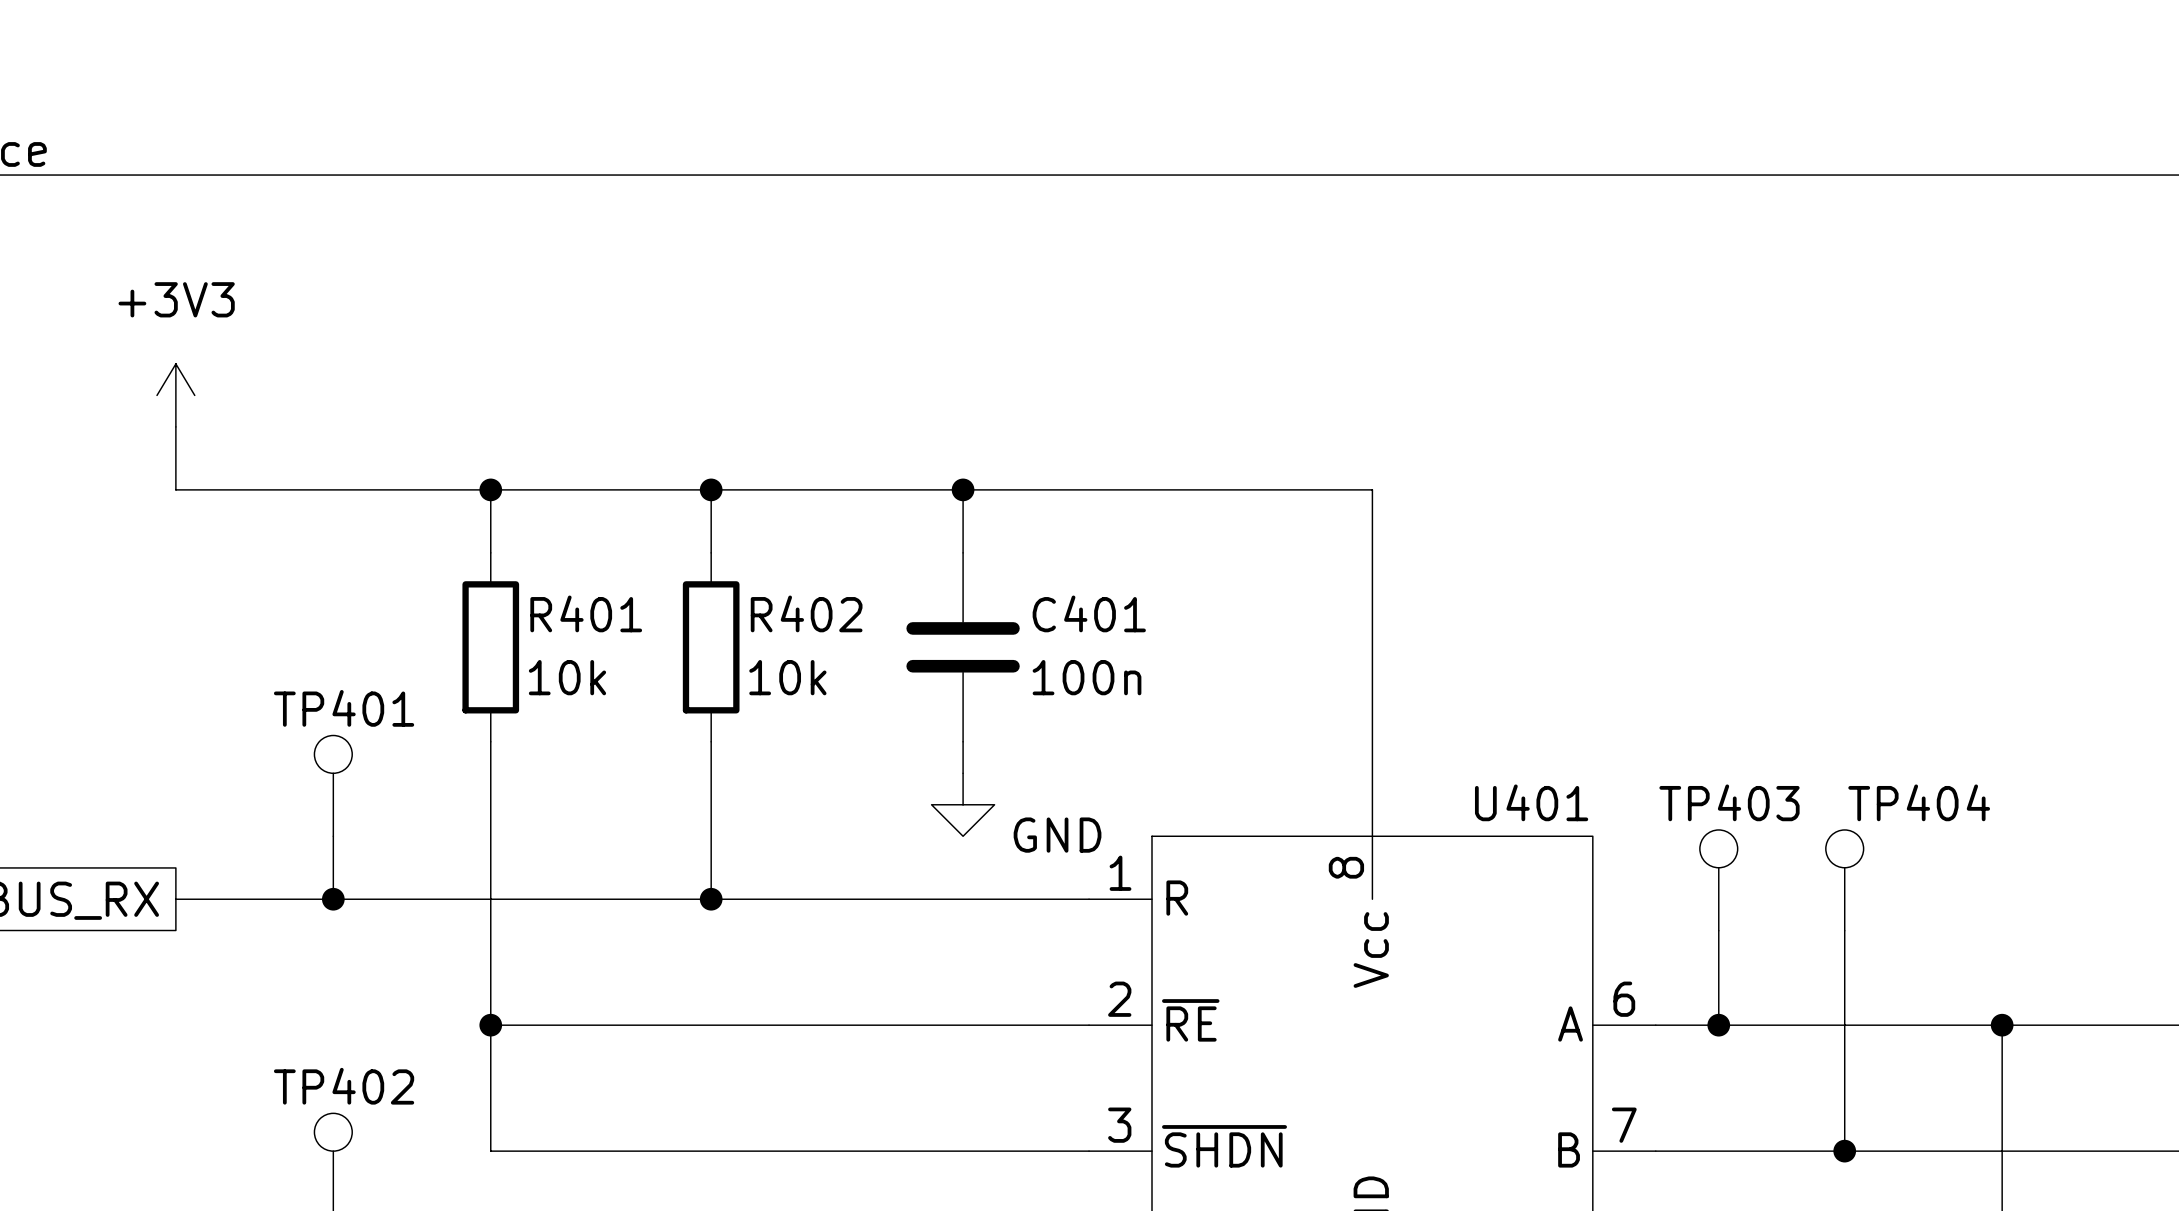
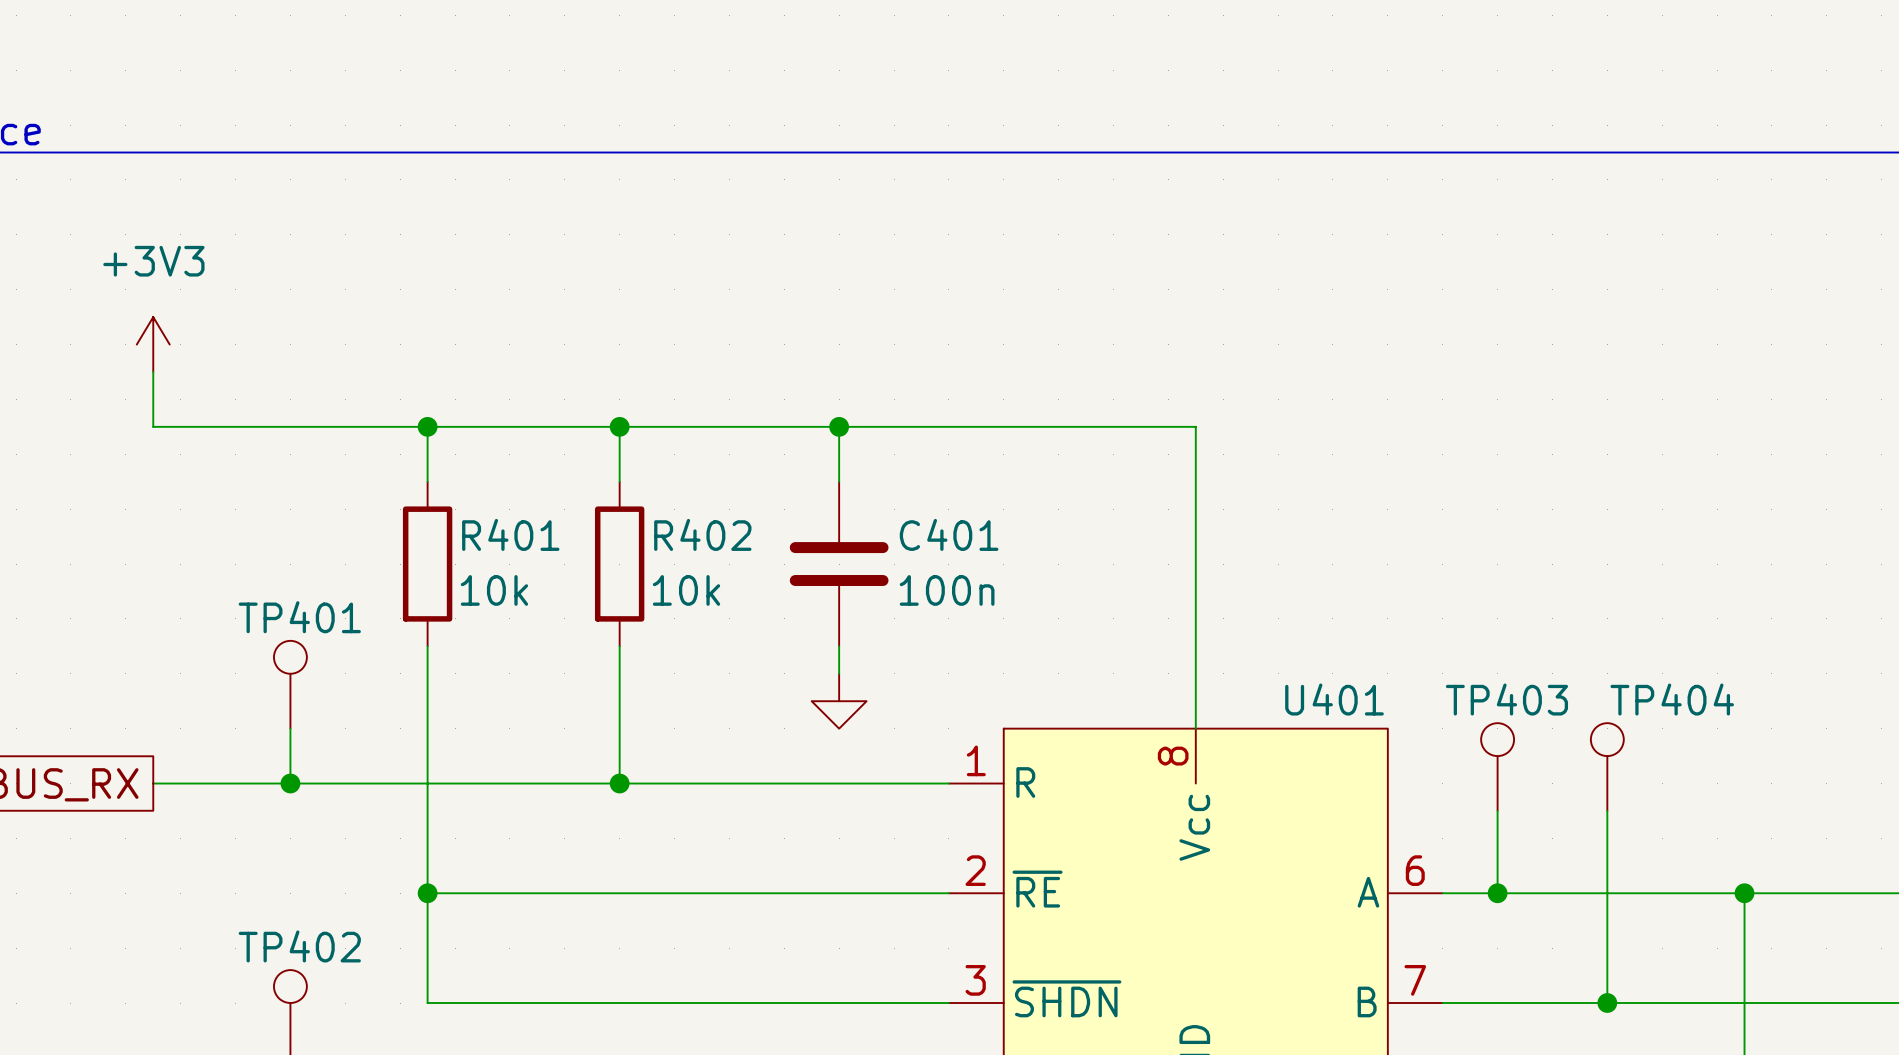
power symbol text: GND (1057, 835) -> none

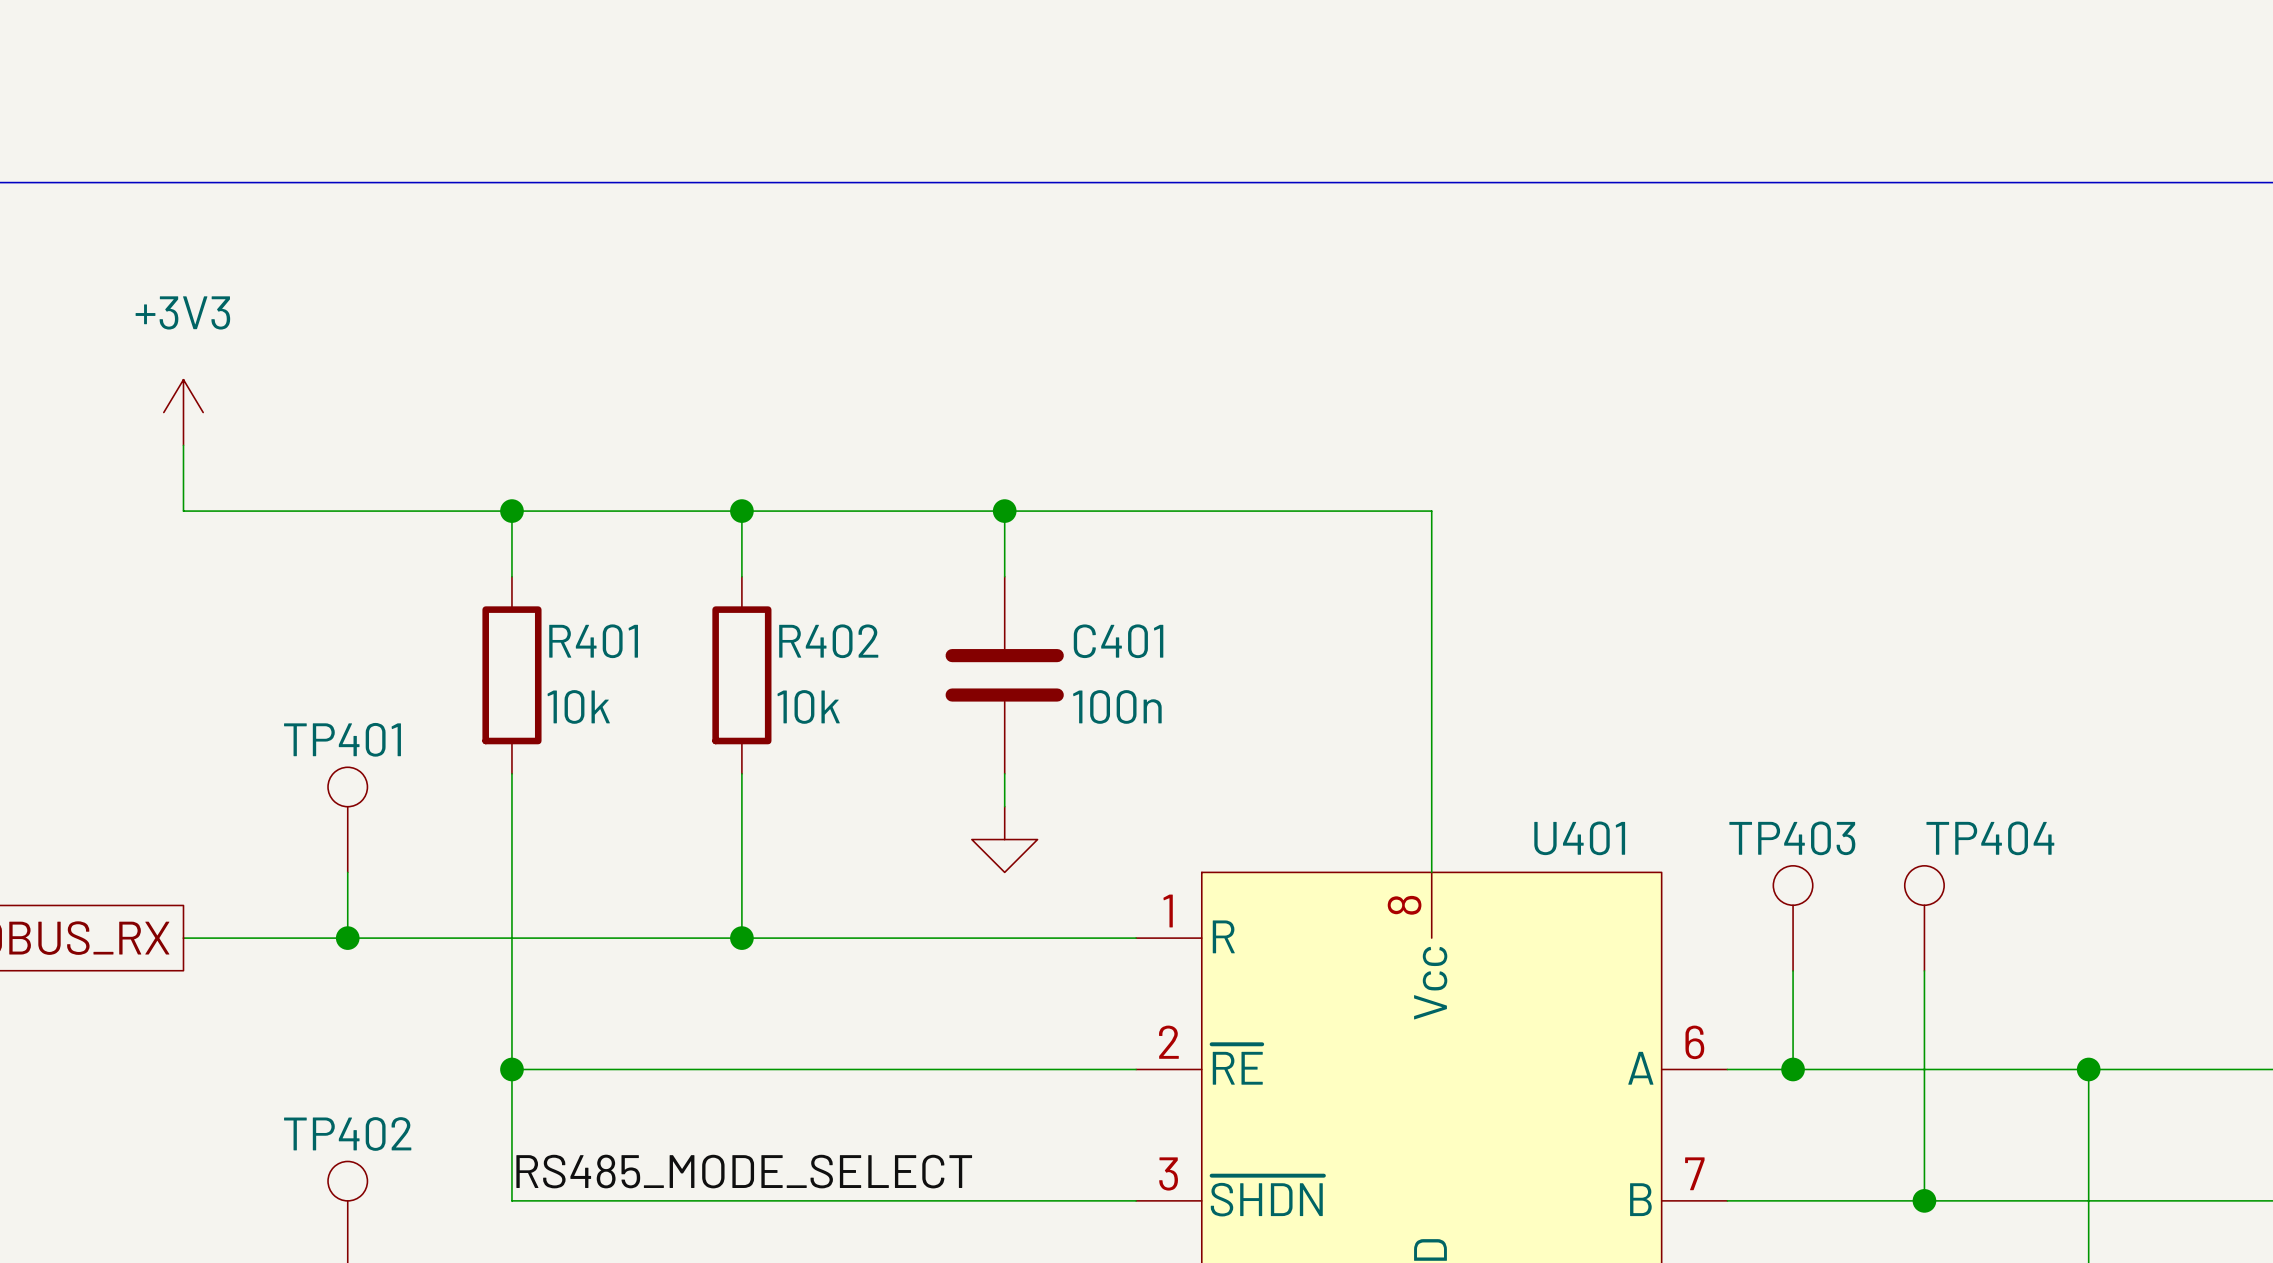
label: none -> RS485_MODE_SELECT (744, 1171)

